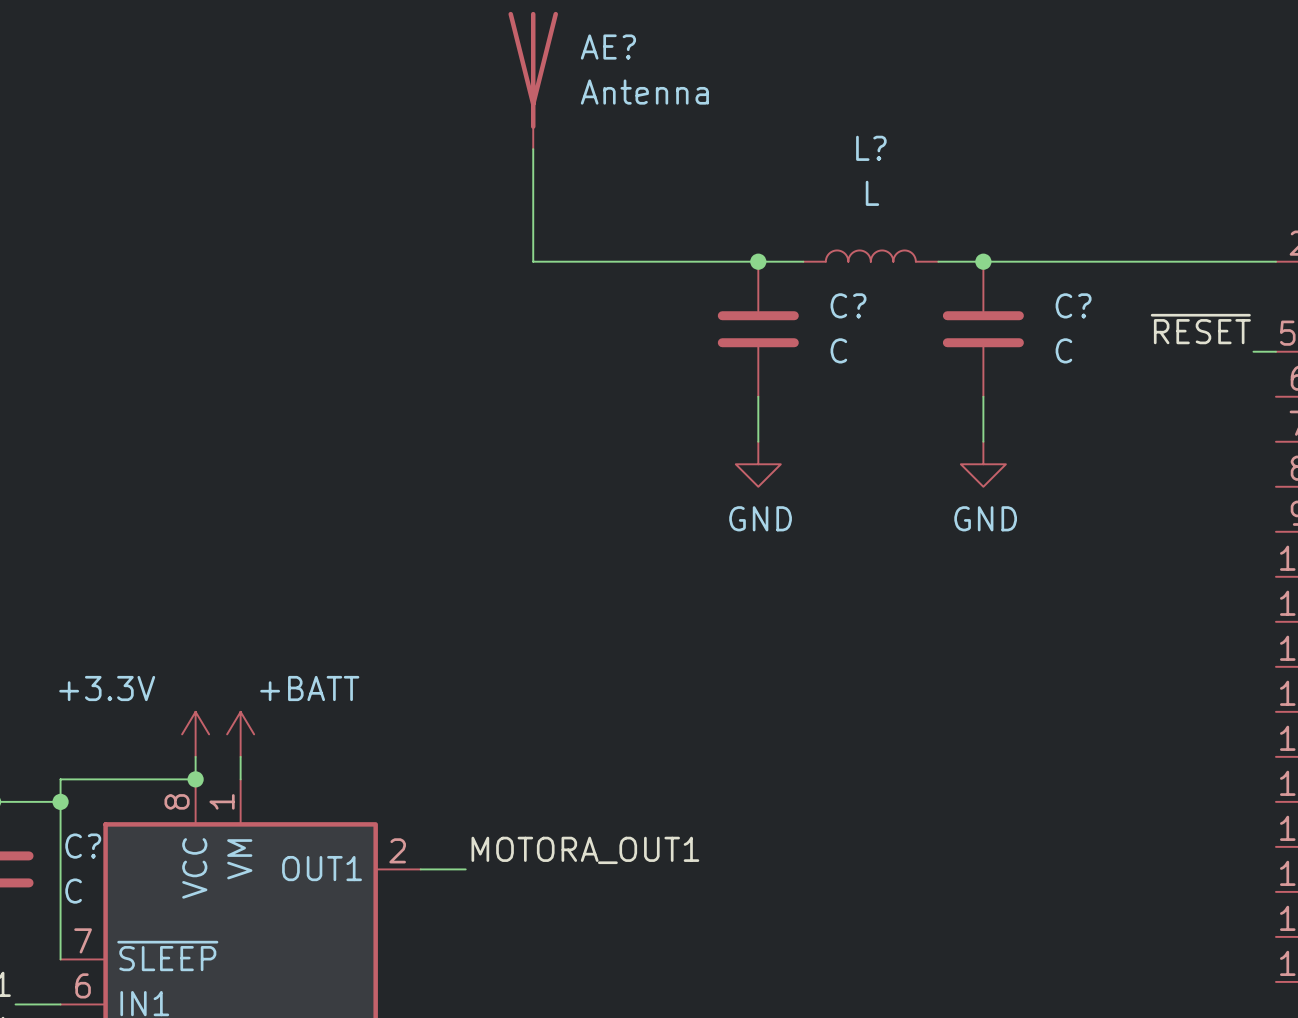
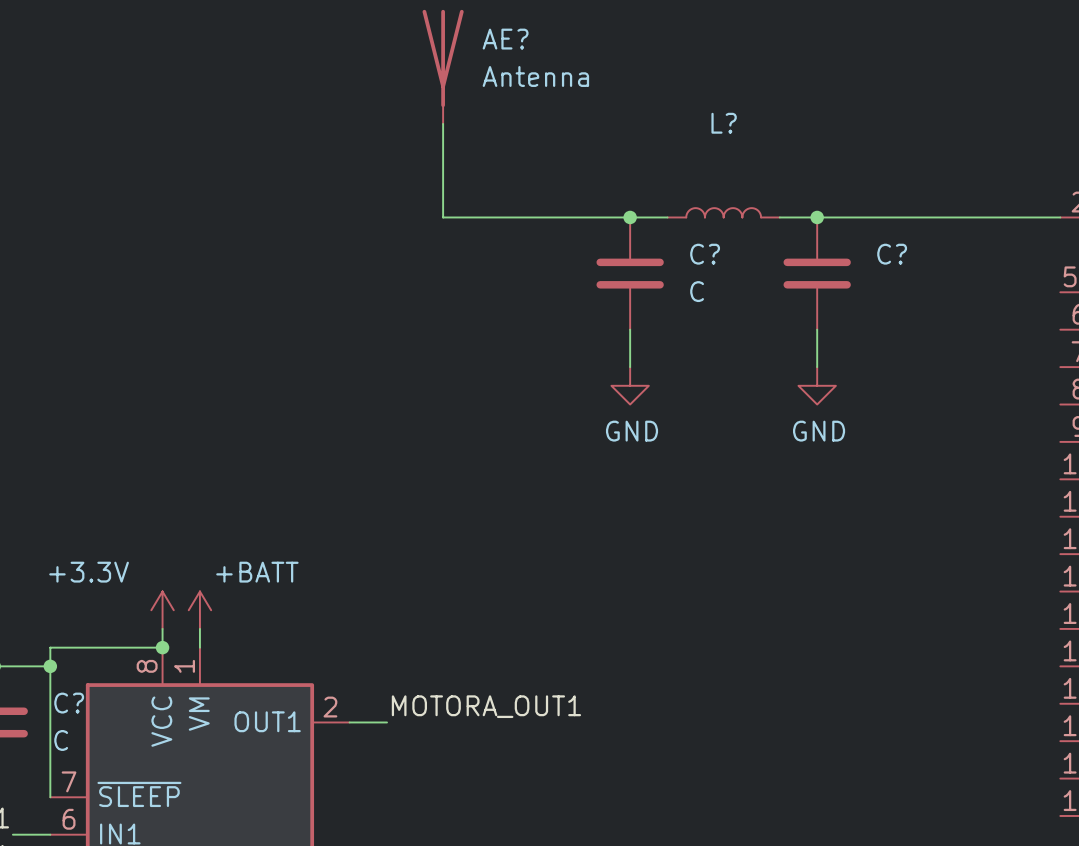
L? value: L (872, 193) -> none
label: ~{RESET} (1200, 329) -> none
C? value: C (1063, 350) -> none
wire: (1253, 351) (1275, 351) -> none

